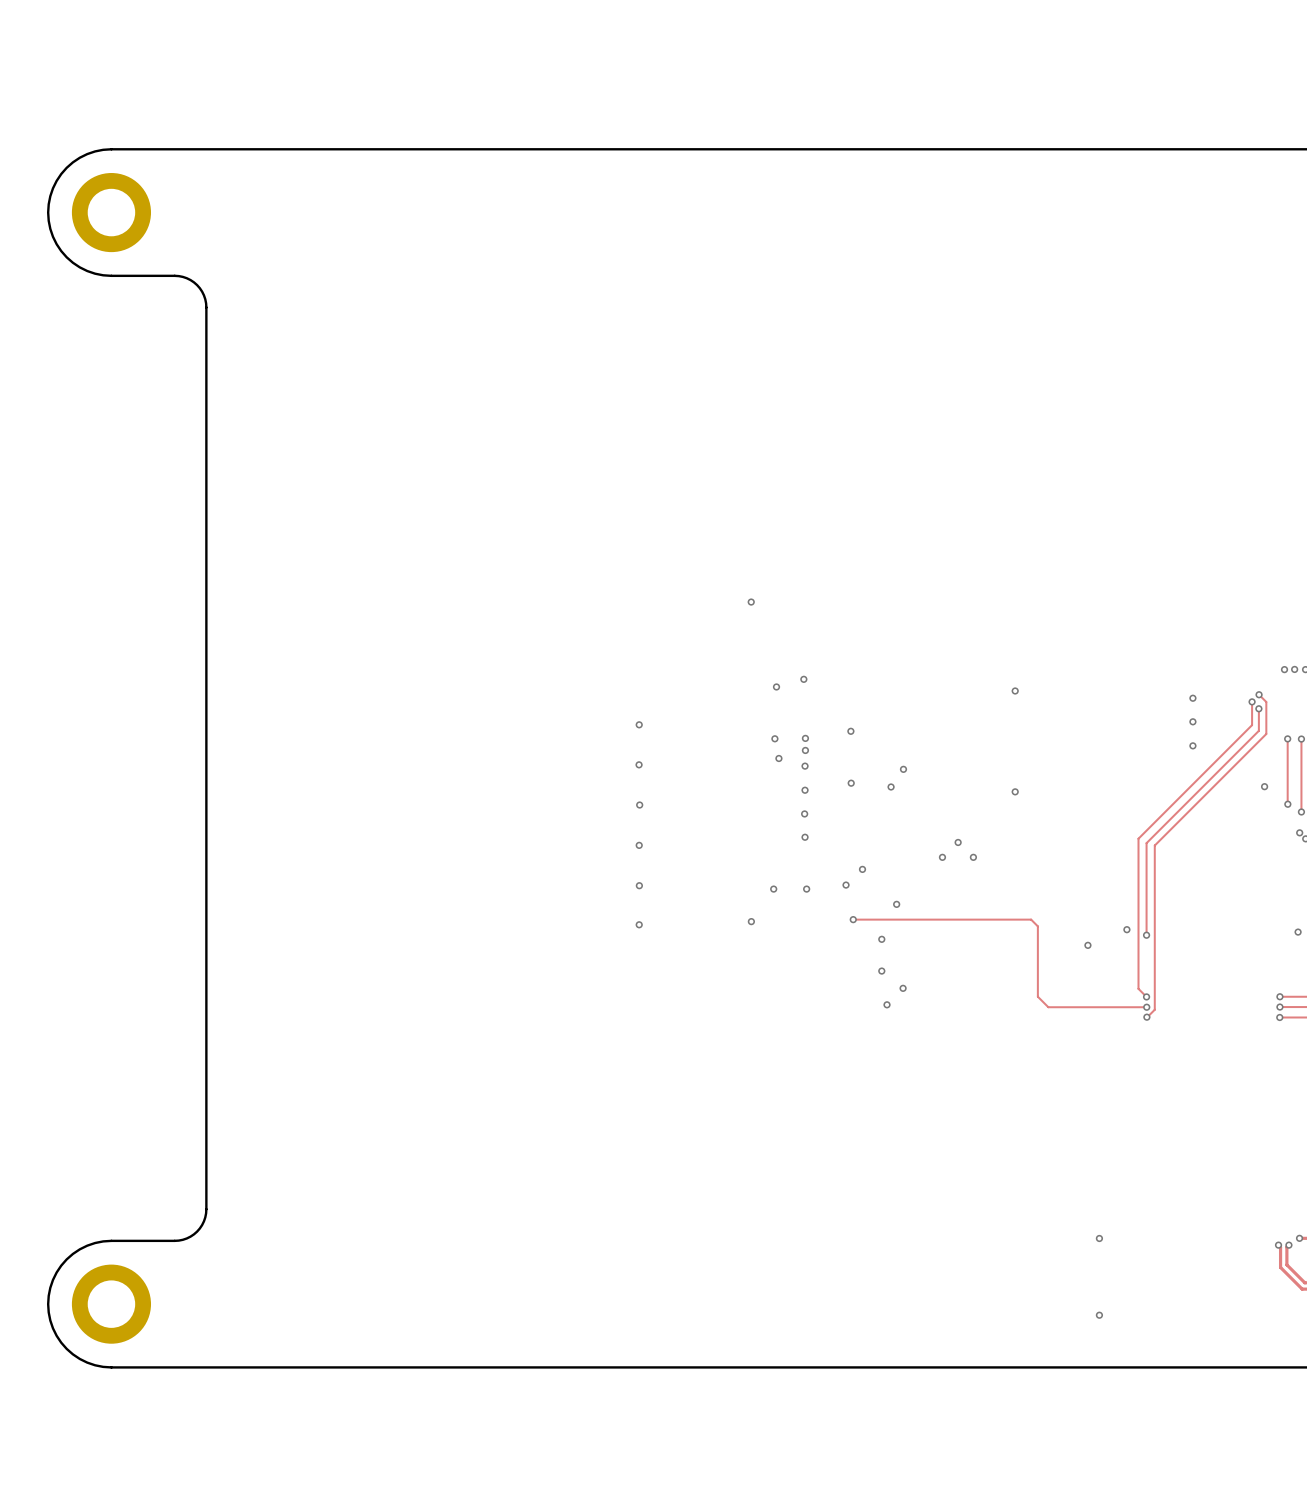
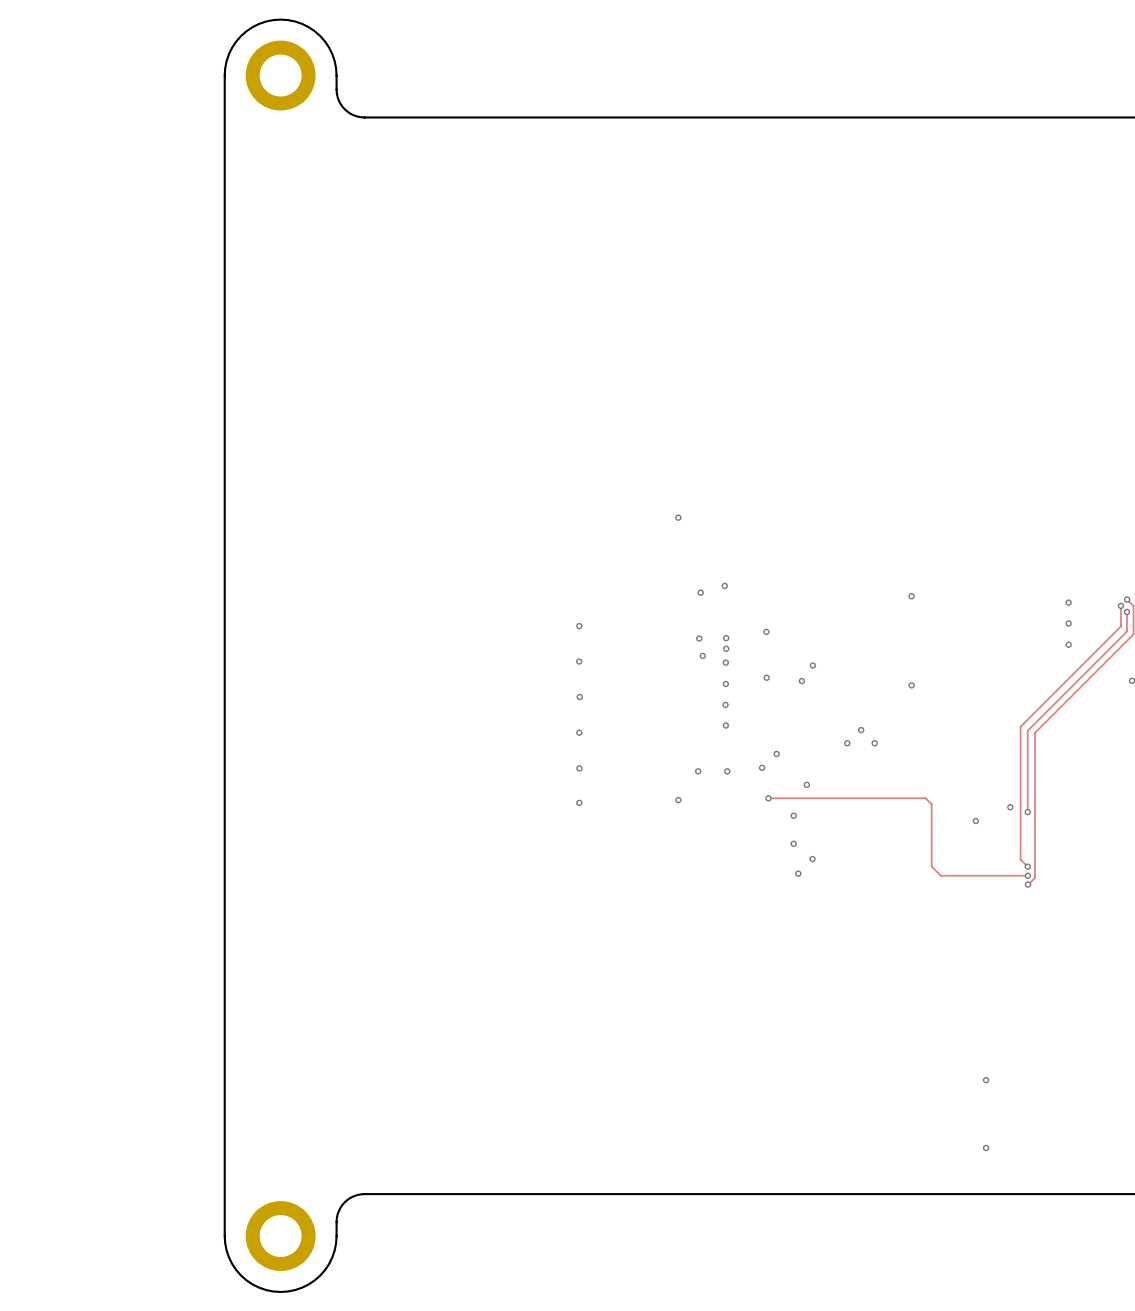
board edge: (396, 149) (103, 149) (79, 157) (61, 174) (50, 196) (48, 212) (50, 228) (56, 244) (66, 257) (79, 267) (103, 275) (182, 276) (190, 280) (199, 288) (203, 295) (206, 307) (206, 1213) (202, 1225) (197, 1231) (182, 1239) (103, 1241) (87, 1245) (72, 1253) (61, 1265) (50, 1287) (48, 1304) (50, 1320) (56, 1335) (66, 1348) (79, 1358) (103, 1366) (396, 1367) -> (364, 117) (350, 113) (340, 103) (336, 93) (336, 68) (332, 54) (325, 41) (308, 27) (287, 20) (266, 21) (246, 31) (232, 47) (226, 61) (224, 75) (224, 1236) (226, 1250) (232, 1264) (246, 1280) (266, 1290) (287, 1291) (308, 1284) (325, 1270) (332, 1257) (336, 1243) (336, 1218) (340, 1208) (350, 1197) (364, 1194)
part position: (111, 212) -> (280, 75)
part position: (111, 1304) -> (280, 1236)

